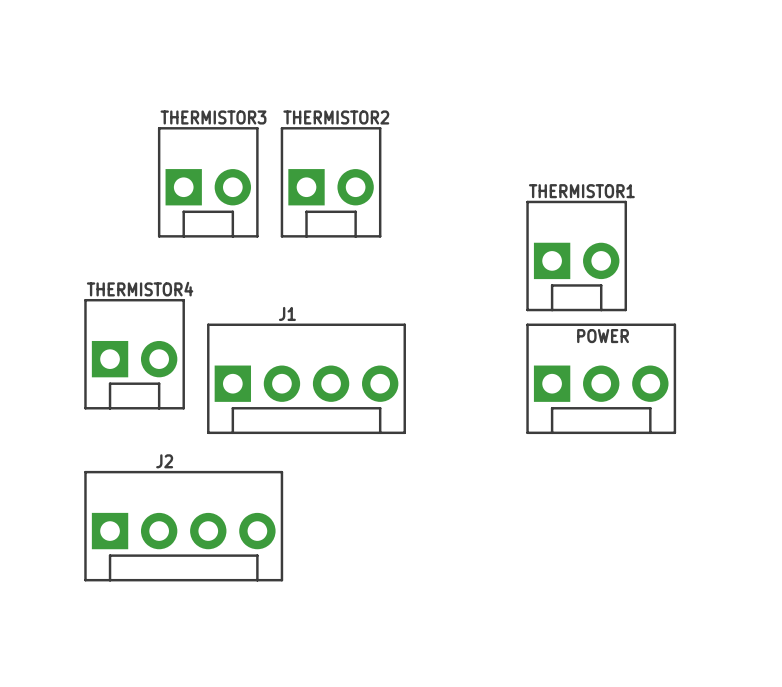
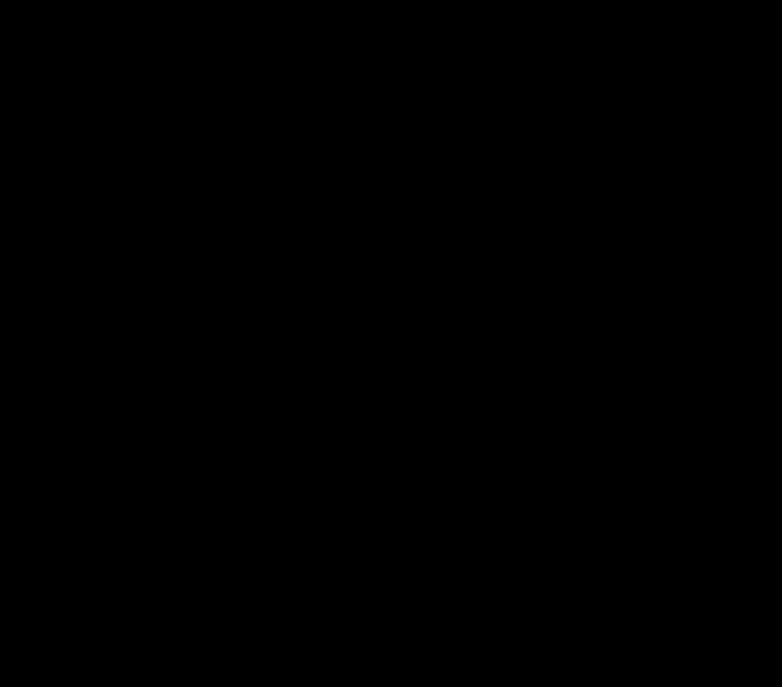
THERMISTOR3: (208, 182) -> none
THERMISTOR2: (331, 182) -> none
THERMISTOR1: (576, 256) -> none
THERMISTOR4: (134, 354) -> none
J1: (306, 378) -> none
POWER: (601, 378) -> none
J2: (183, 526) -> none

